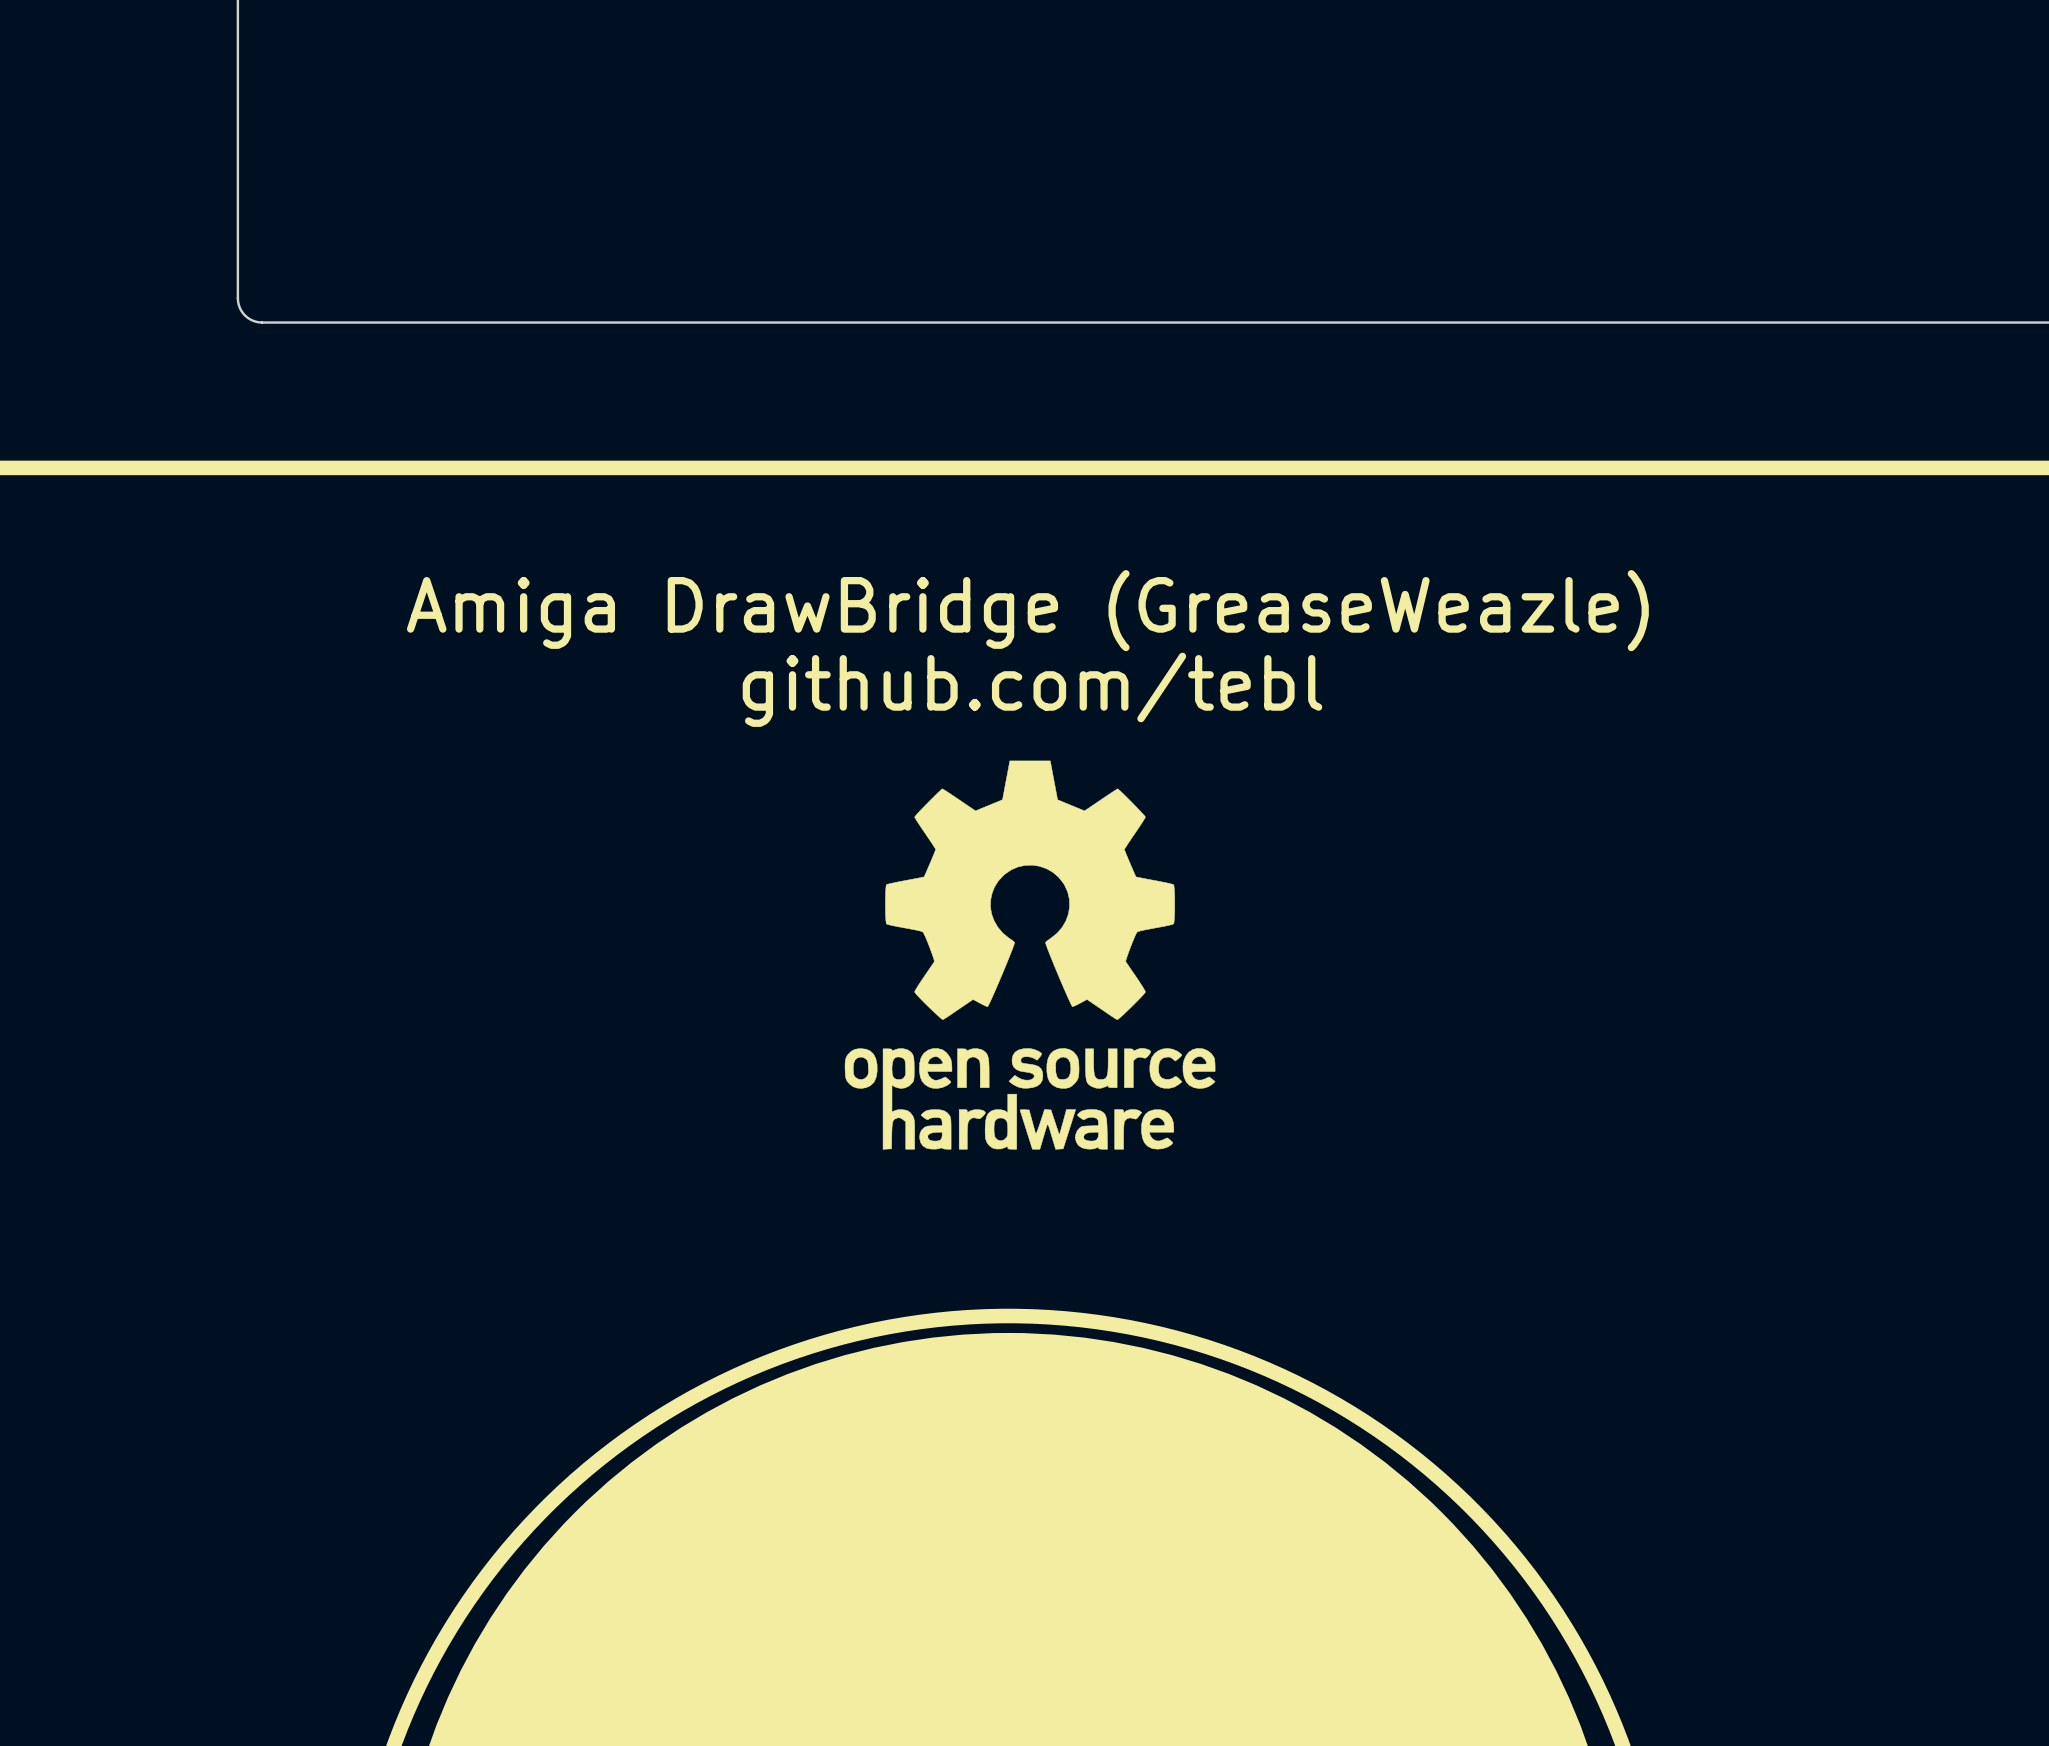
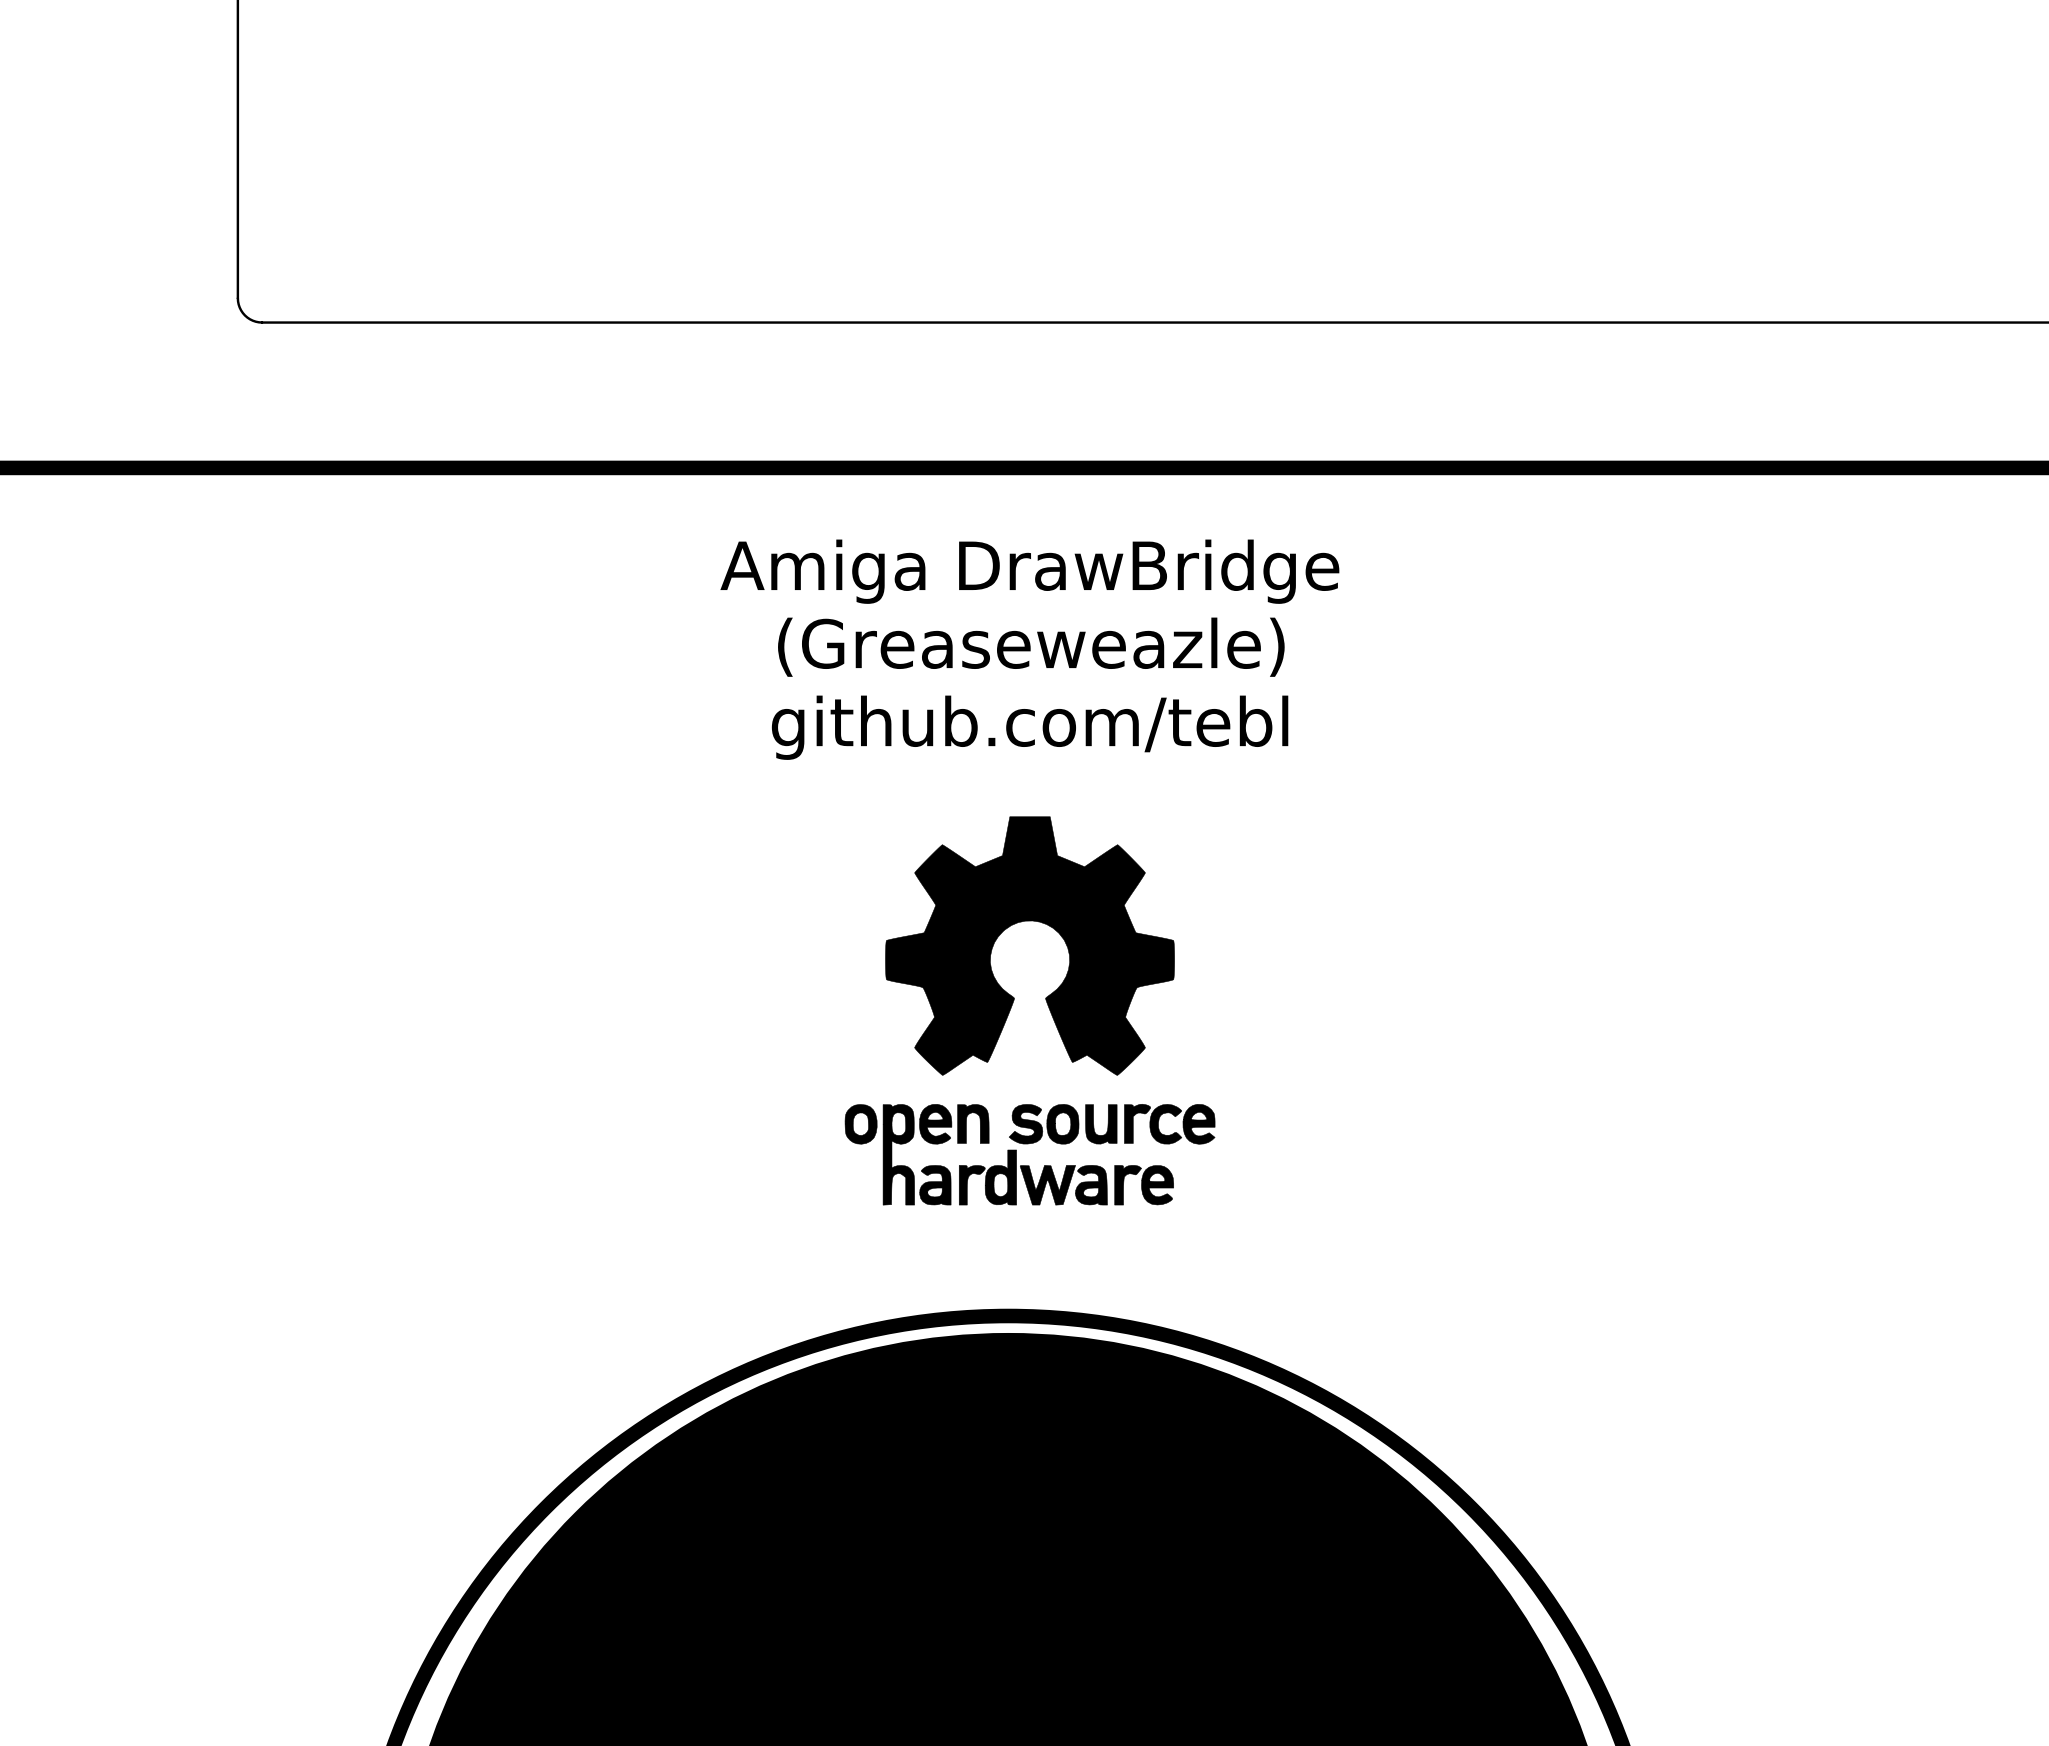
text: Amiga DrawBridge (GreaseWeazle) (1027, 610) -> Amiga DrawBridge (1029, 571)
text: none -> (Greaseweazle) (1031, 647)
text position: github.com/tebl (1032, 689) -> github.com/tebl (1030, 727)
drawing position: (1030, 955) -> (1030, 1010)

